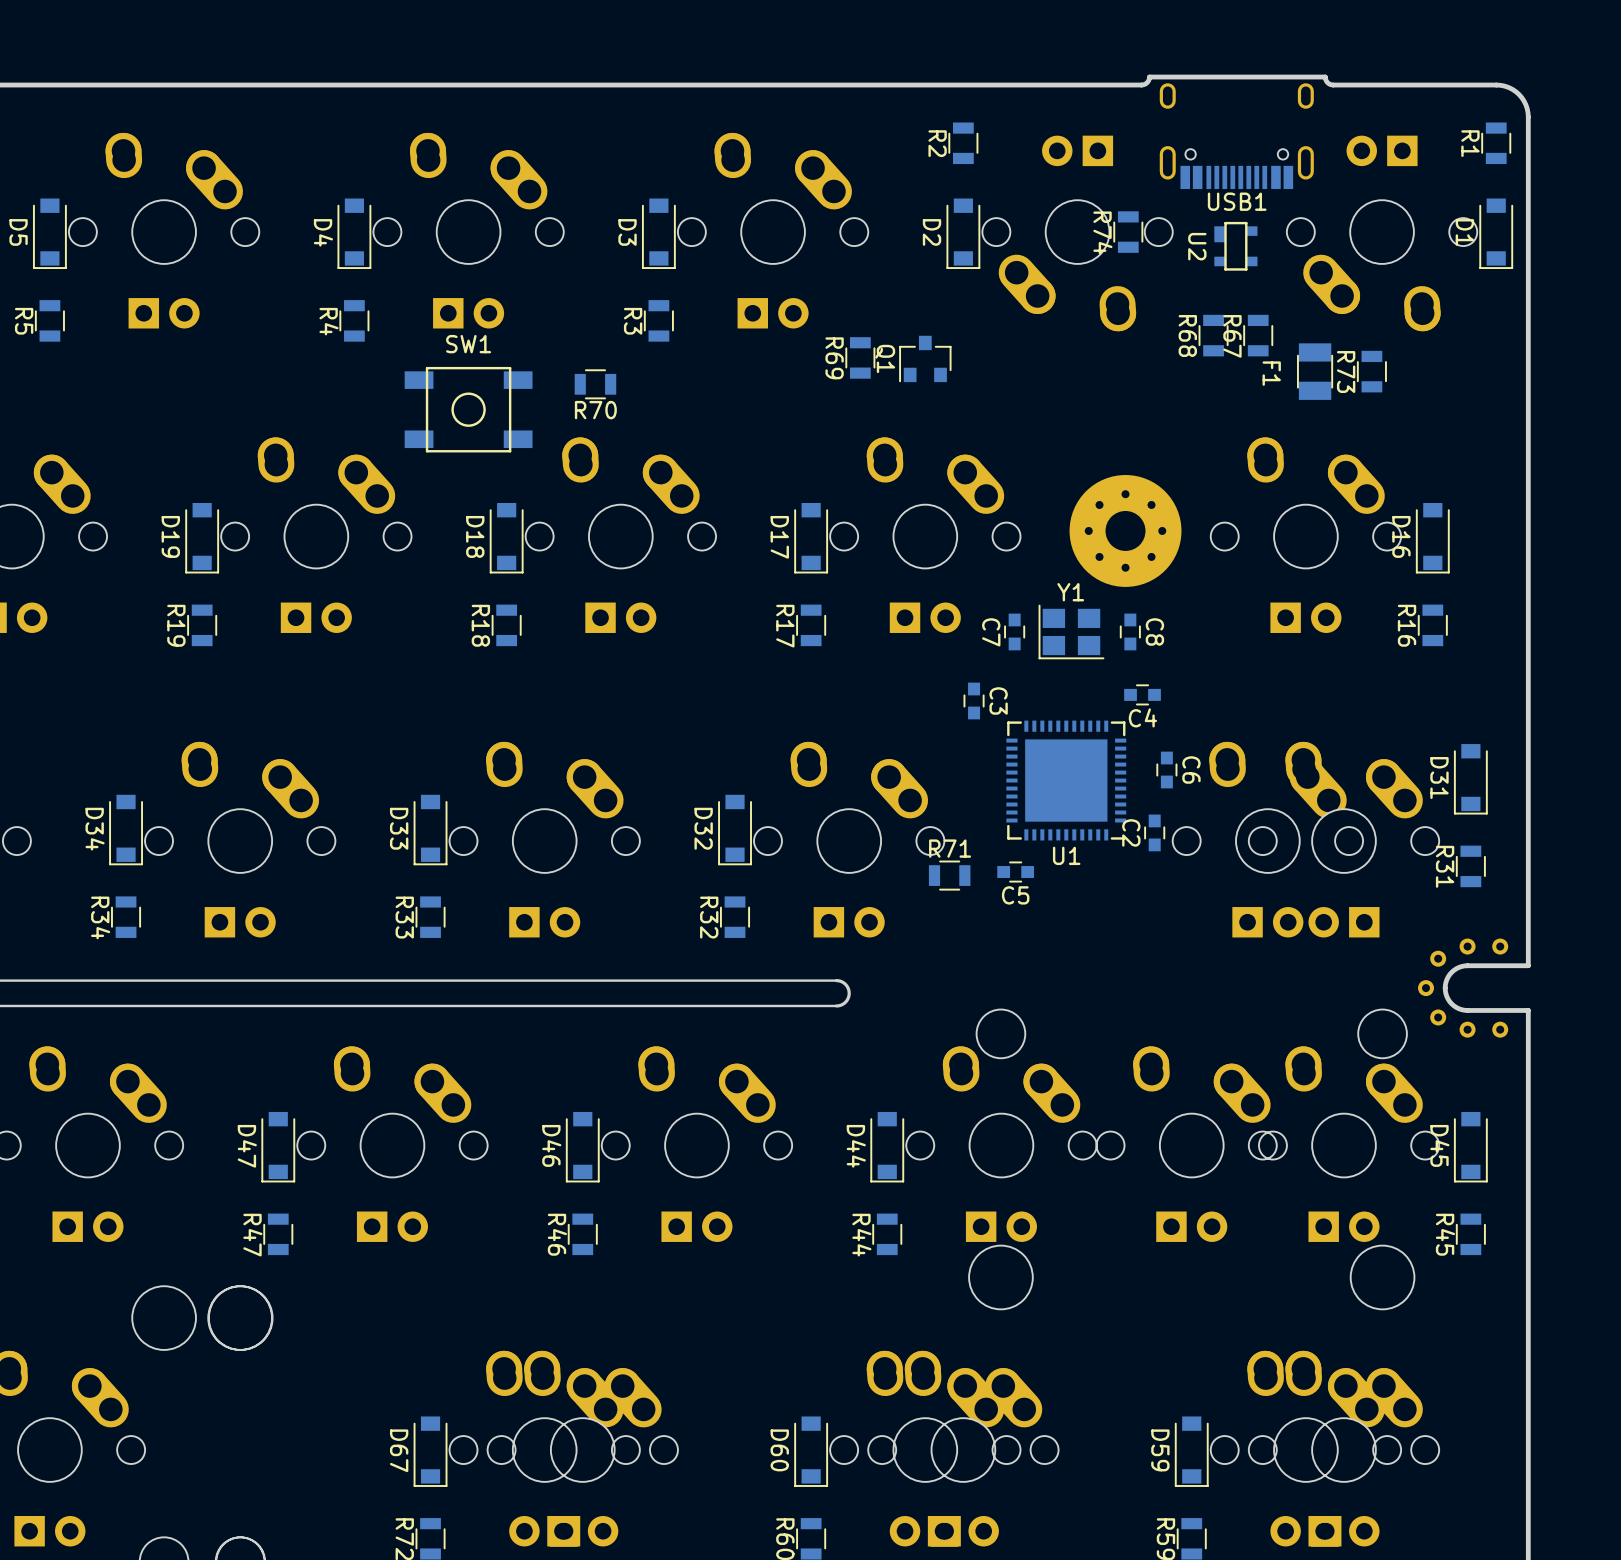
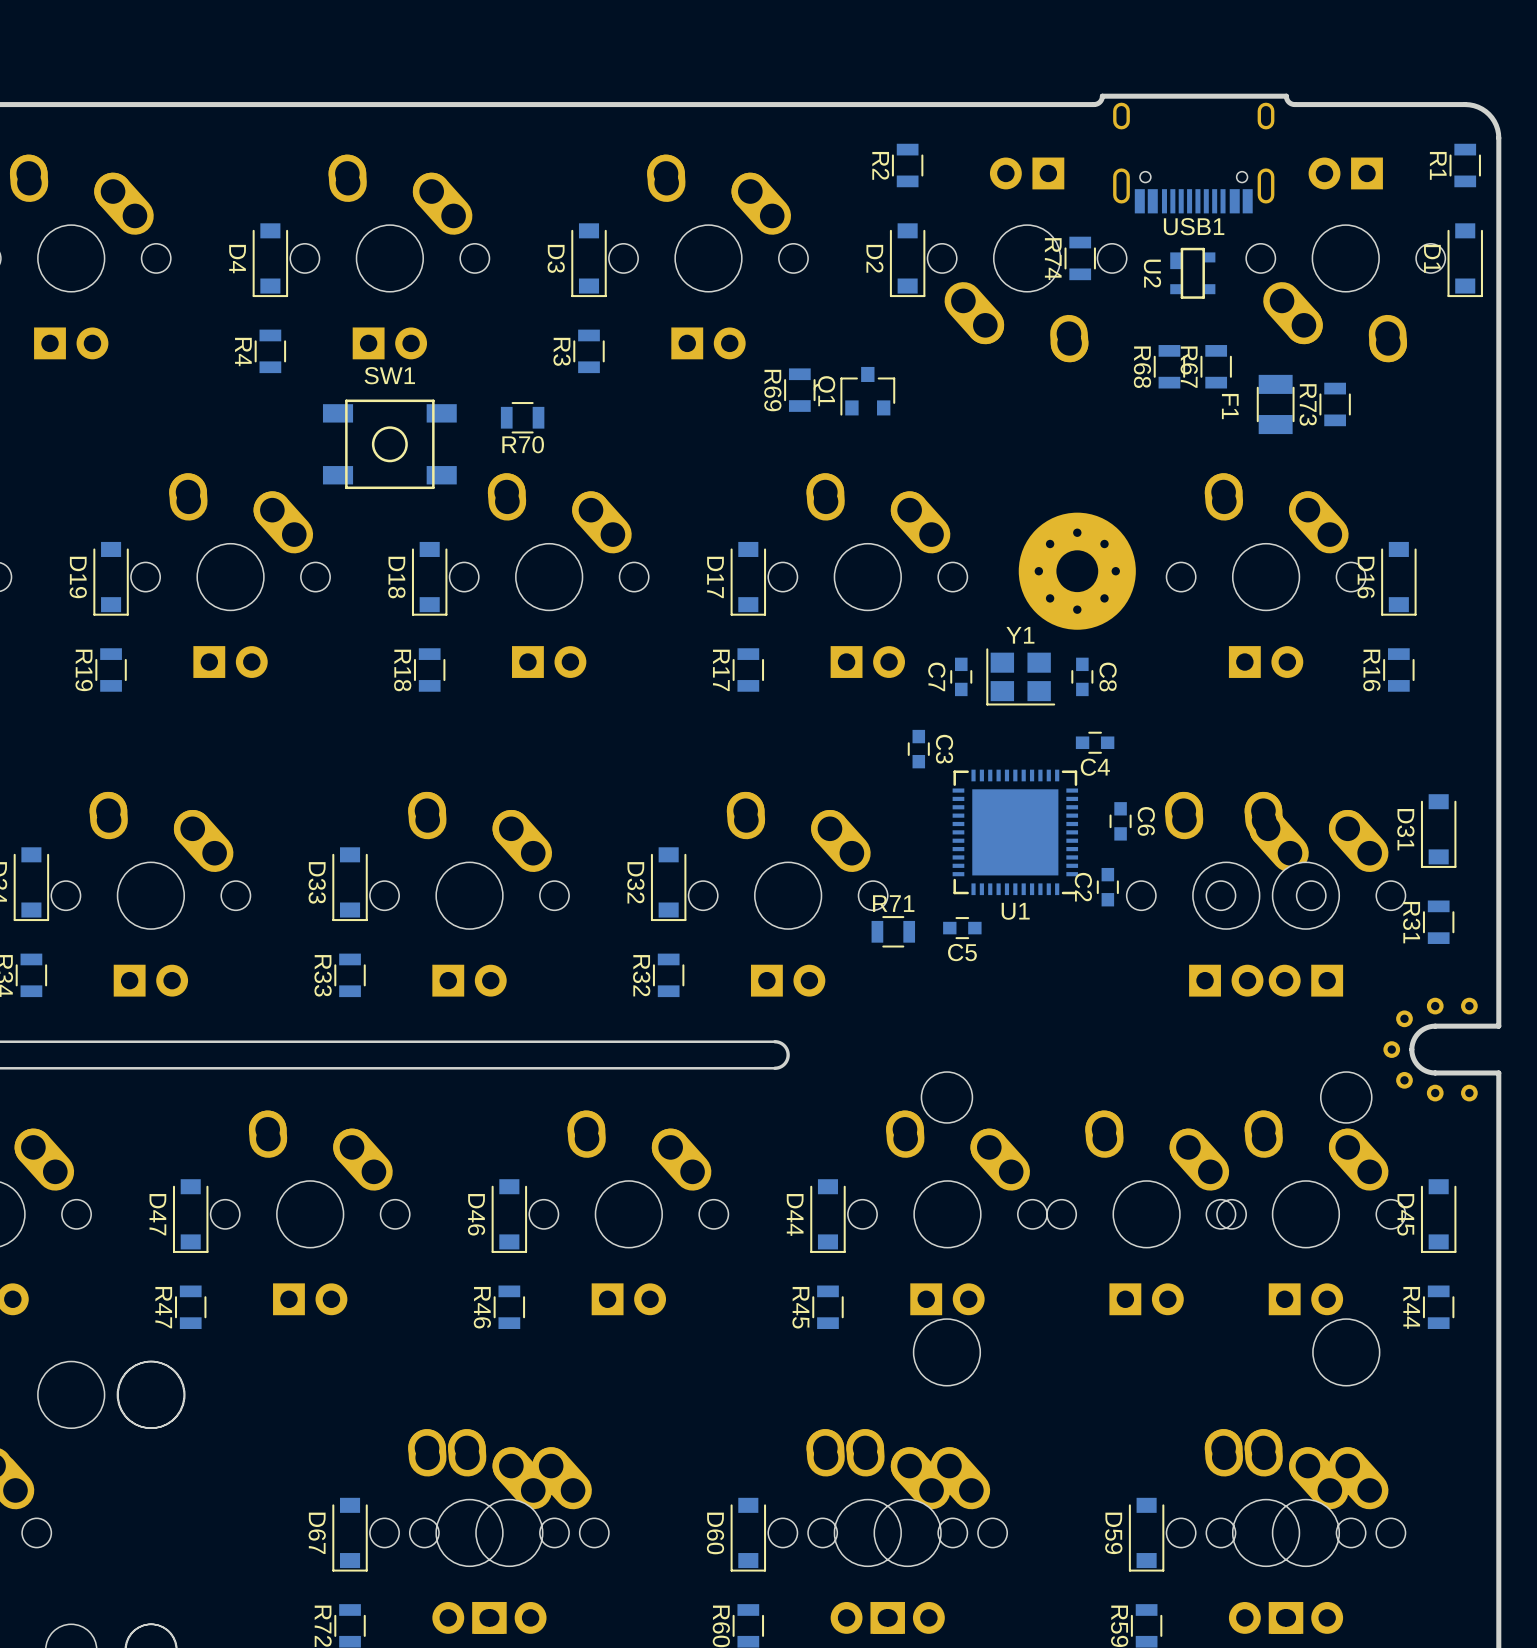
R45 name: R45 (1445, 1234) -> R44 (1411, 1307)
R44 name: R44 (861, 1235) -> R45 (800, 1307)

